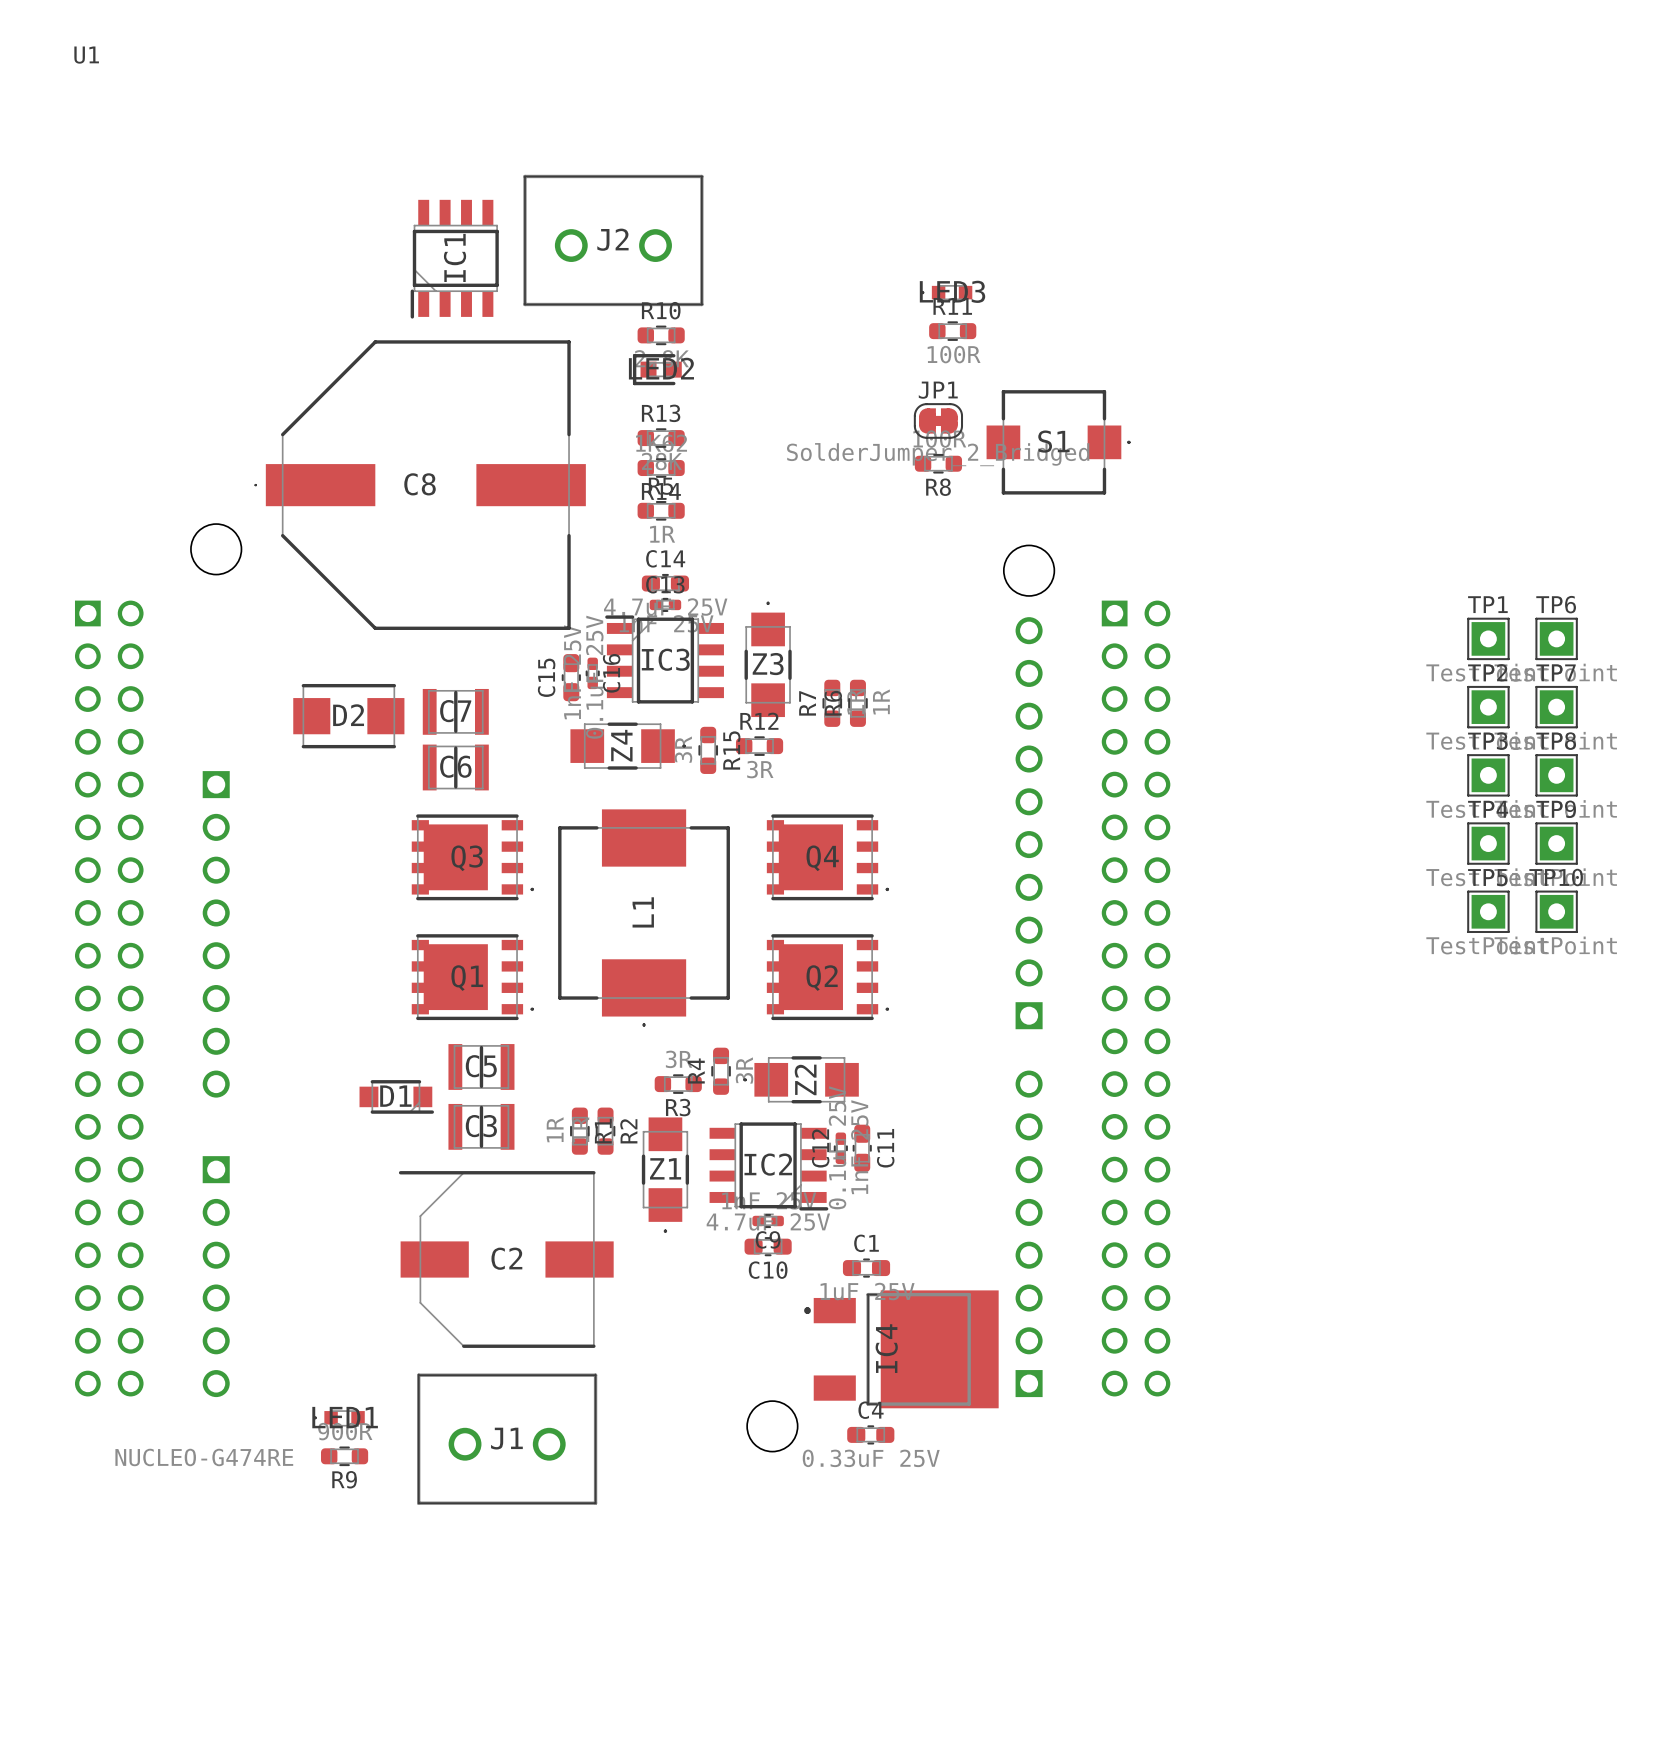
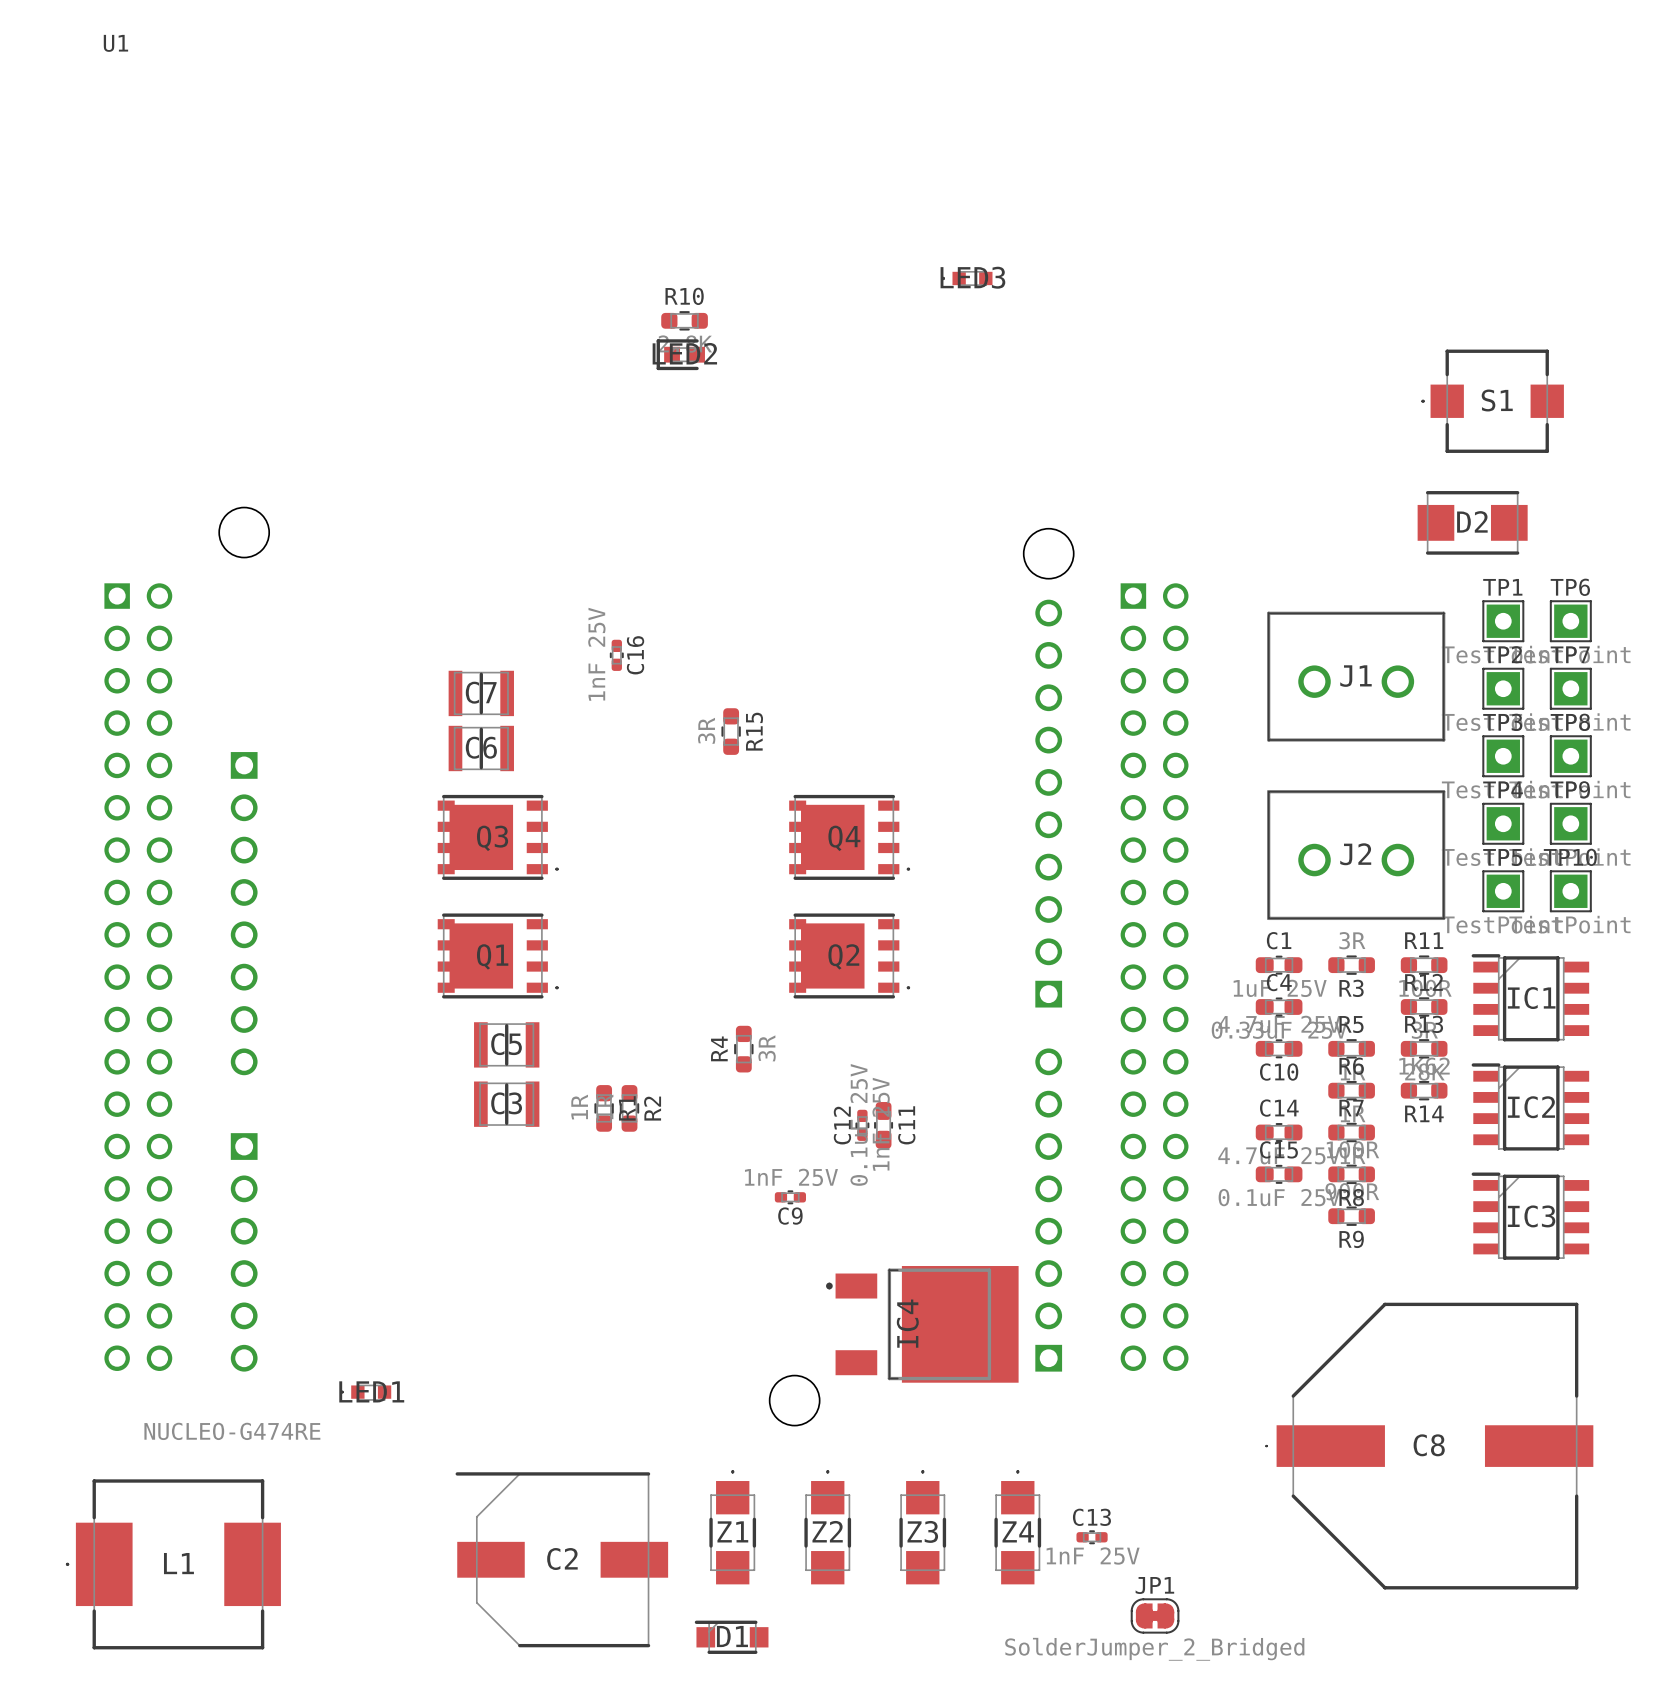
J2 position: (613, 240) -> (1356, 855)
IC1 rotation: 0° (454, 259) -> 90° clockwise (1530, 997)
IC1 position: (454, 259) -> (1530, 997)
R11 position: (952, 331) -> (1424, 965)
JP1 position: (938, 420) -> (1155, 1615)
R13 position: (661, 438) -> (1424, 1048)
S1 rotation: 0° (1058, 442) -> 180° (1492, 401)
S1 position: (1058, 442) -> (1492, 401)
R8 position: (938, 463) -> (1351, 1174)
R14 position: (661, 468) -> (1424, 1090)
C8 position: (420, 485) -> (1429, 1446)
R5 position: (661, 510) -> (1351, 1048)
C14 position: (665, 583) -> (1279, 1132)
C13 position: (665, 604) -> (1092, 1537)
IC3 position: (664, 659) -> (1530, 1216)
Z3 position: (768, 659) -> (922, 1527)
C15 rotation: 0° (571, 677) -> 90° clockwise (1279, 1174)
C15 position: (571, 677) -> (1279, 1174)
R7 rotation: 0° (832, 703) -> 90° clockwise (1351, 1132)
R7 position: (832, 703) -> (1351, 1132)
R6 rotation: 0° (857, 703) -> 90° clockwise (1351, 1090)
R6 position: (857, 703) -> (1351, 1090)
D2 position: (348, 716) -> (1472, 522)
Z4 rotation: 0° (628, 746) -> 90° counterclockwise (1017, 1527)
Z4 position: (628, 746) -> (1017, 1527)
R12 position: (759, 746) -> (1424, 1006)
L1 rotation: 0° (644, 918) -> 90° clockwise (173, 1564)
L1 position: (644, 918) -> (173, 1564)
Z2 rotation: 0° (801, 1079) -> 90° clockwise (827, 1527)
Z2 position: (801, 1079) -> (827, 1527)
R3 position: (678, 1084) -> (1351, 965)
D1 rotation: 0° (396, 1096) -> 180° (731, 1637)
D1 position: (396, 1096) -> (731, 1637)
IC2 rotation: 0° (768, 1166) -> 180° (1530, 1106)
IC2 position: (768, 1166) -> (1530, 1106)
Z1 rotation: 0° (665, 1175) -> 180° (732, 1527)
Z1 position: (665, 1175) -> (732, 1527)
C10 position: (768, 1246) -> (1279, 1048)
C2 position: (506, 1259) -> (561, 1559)
C1 position: (866, 1268) -> (1279, 965)
C4 position: (870, 1434) -> (1279, 1006)
J1 position: (507, 1439) -> (1356, 676)
R9 position: (344, 1456) -> (1351, 1216)

